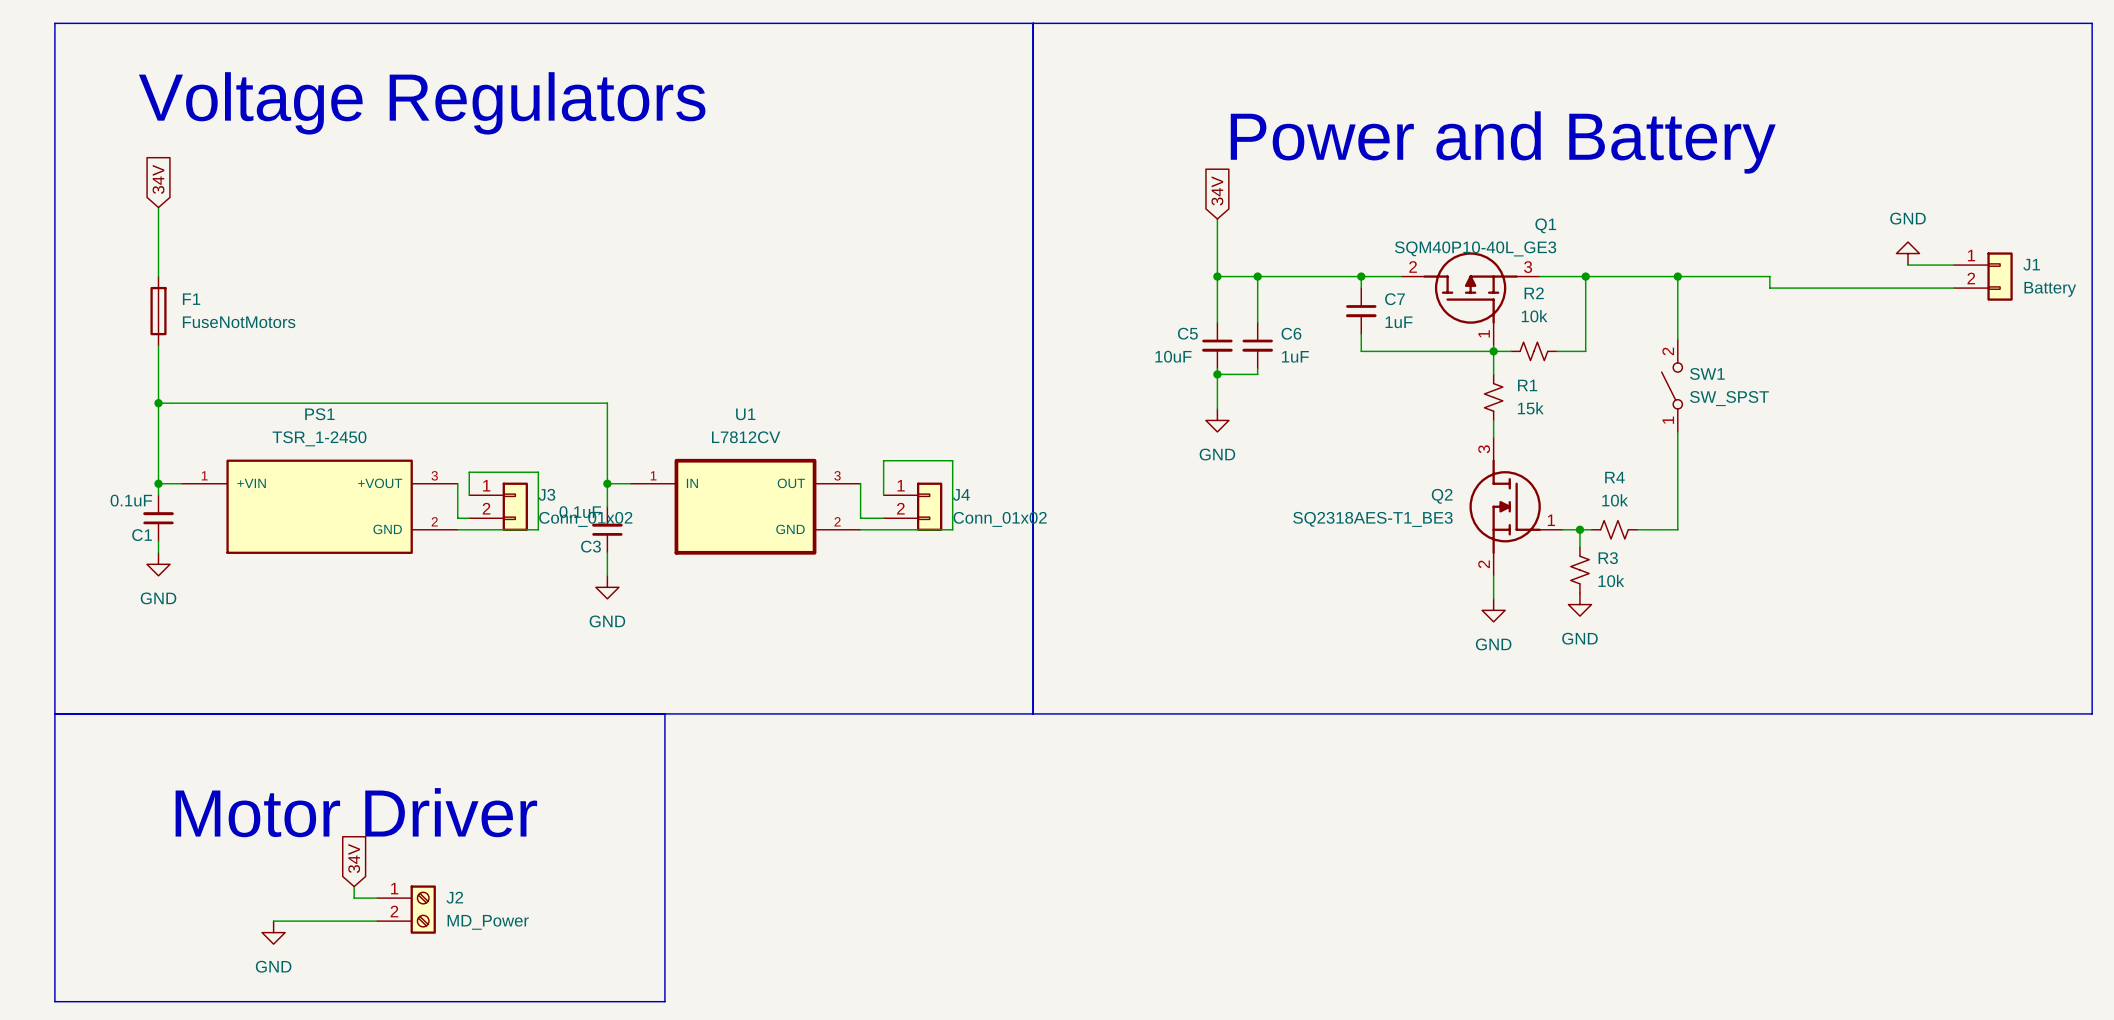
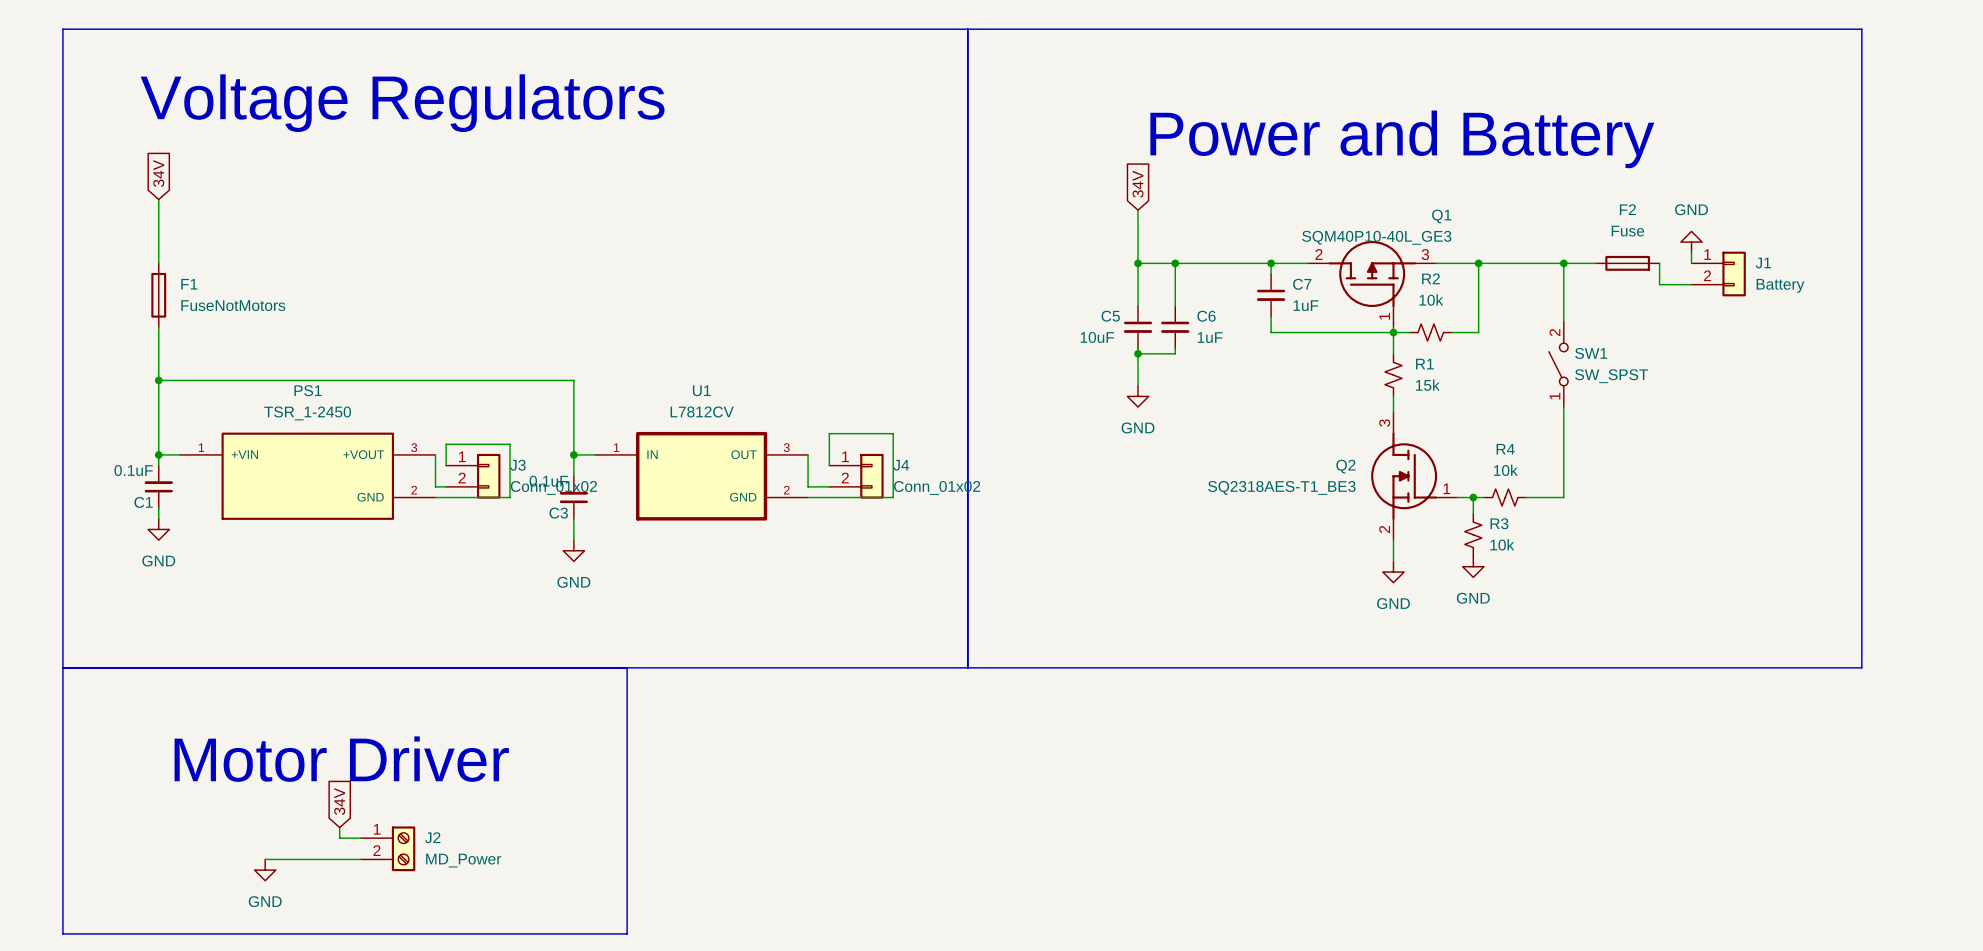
line: (2000, 23) (2092, 23) (2092, 713) (2000, 713) -> (1861, 29) (1861, 667)
power symbol position: GND (1907, 253) -> GND (1691, 242)
wire: none -> (1691, 252) (1691, 263)
wire: (1907, 265) (1954, 265) -> none
wire: (1712, 276) (1769, 276) (1769, 288) (1954, 288) -> none
F2: none -> Fuse (1627, 263)
wire: none -> (1659, 263) (1659, 284) (1691, 284)
J1 position: (1983, 276) -> (1718, 274)

